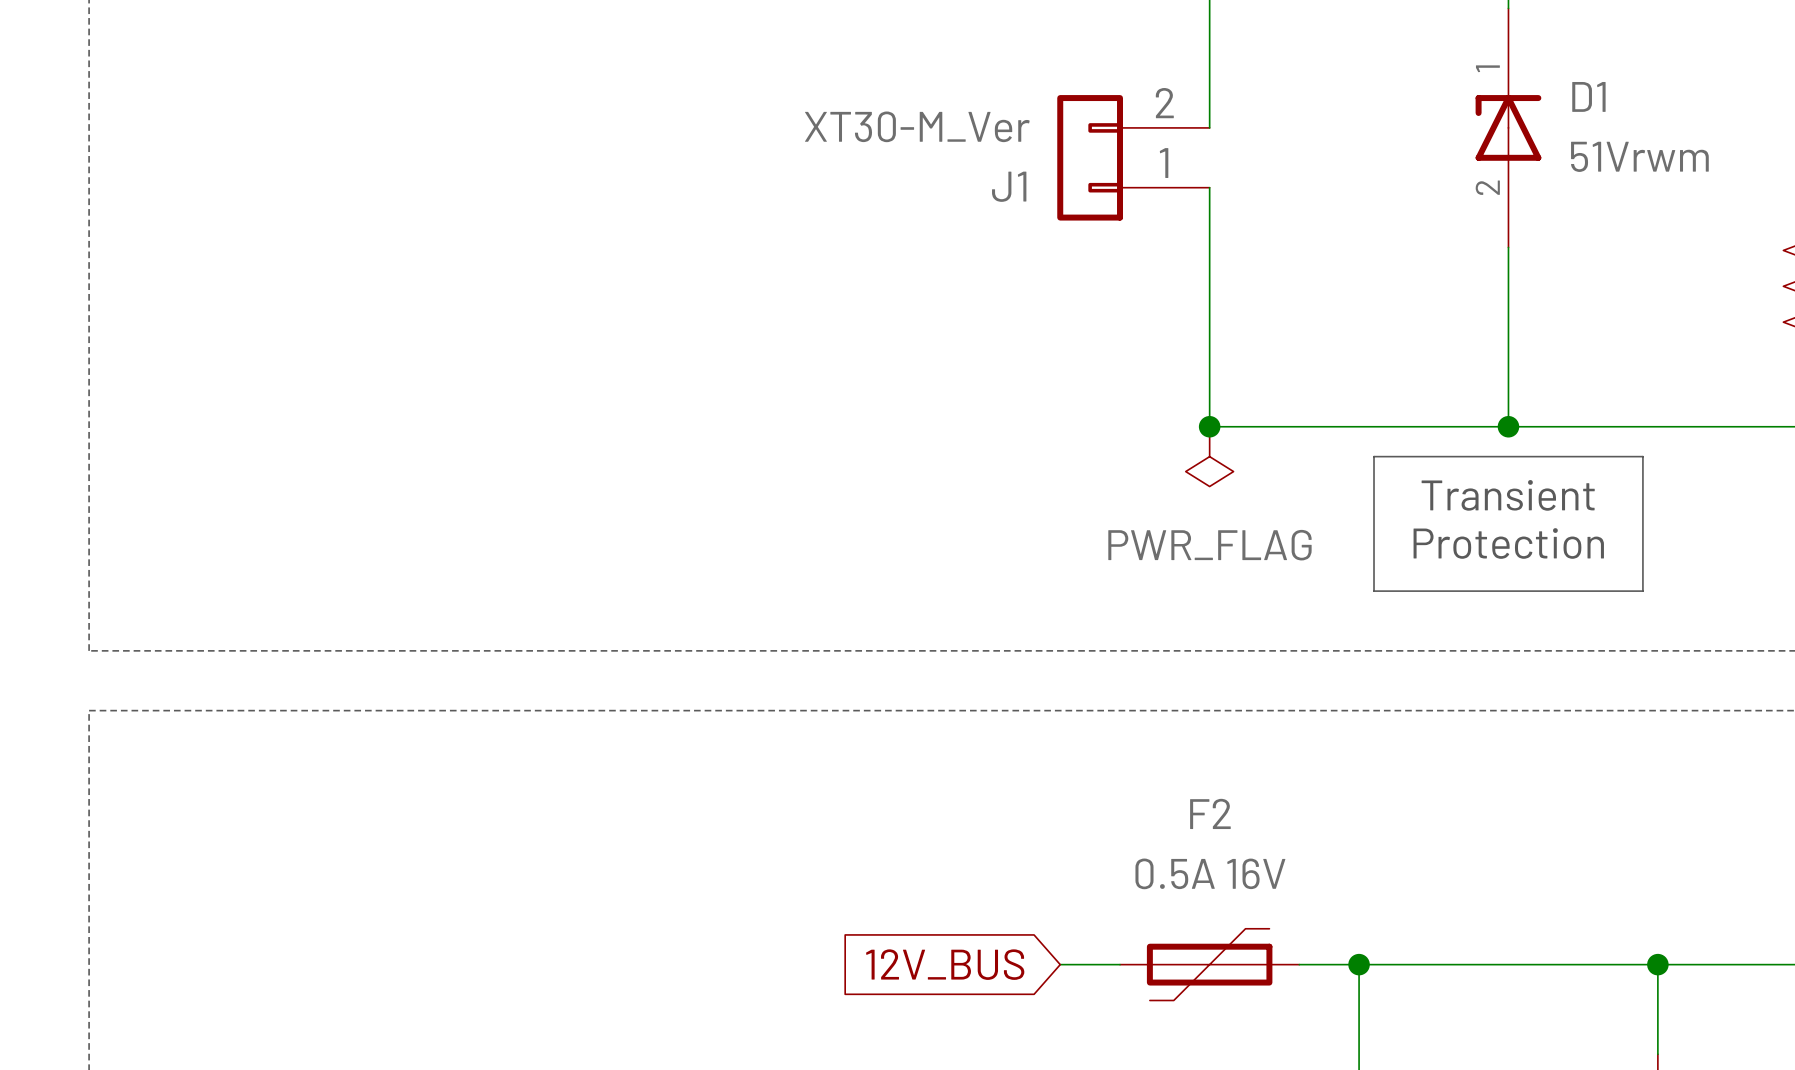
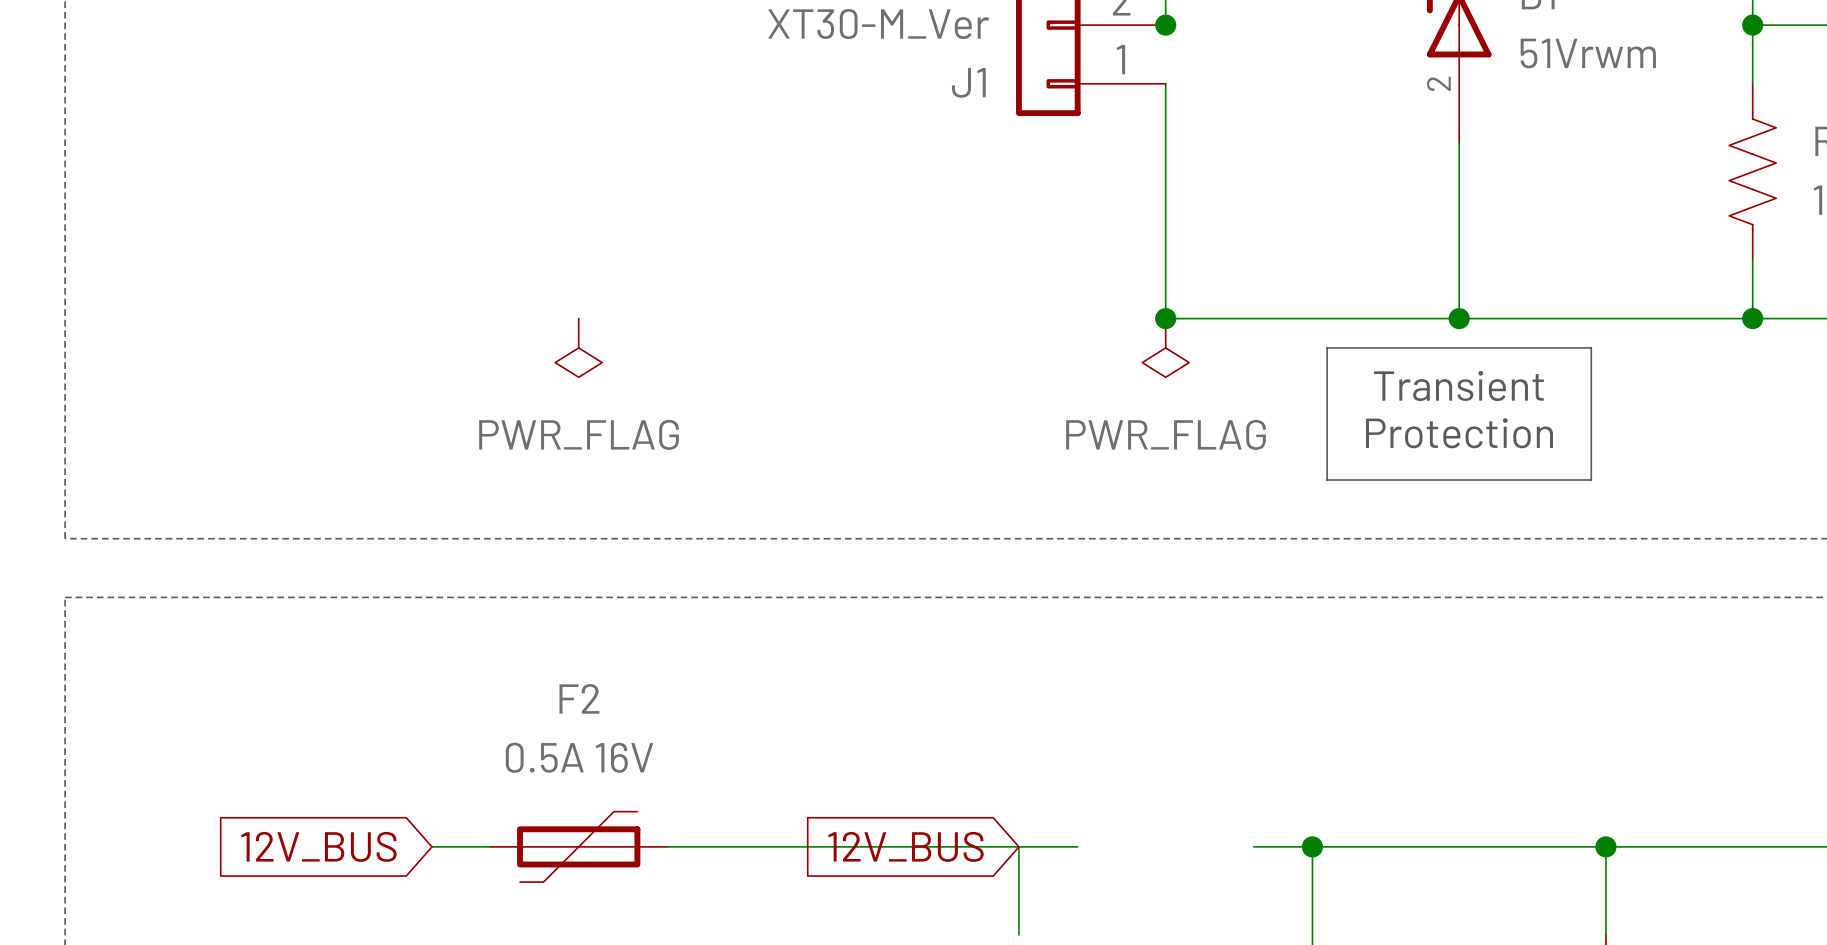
junction: none -> (1165, 25)
power symbol: none -> PWR_FLAG (578, 347)
global label: none -> 12V_BUS (318, 846)
wire: none -> (431, 846) (490, 846)
wire: none -> (666, 846) (1018, 846) (1018, 934)
F2 position: (1209, 964) -> (578, 846)

